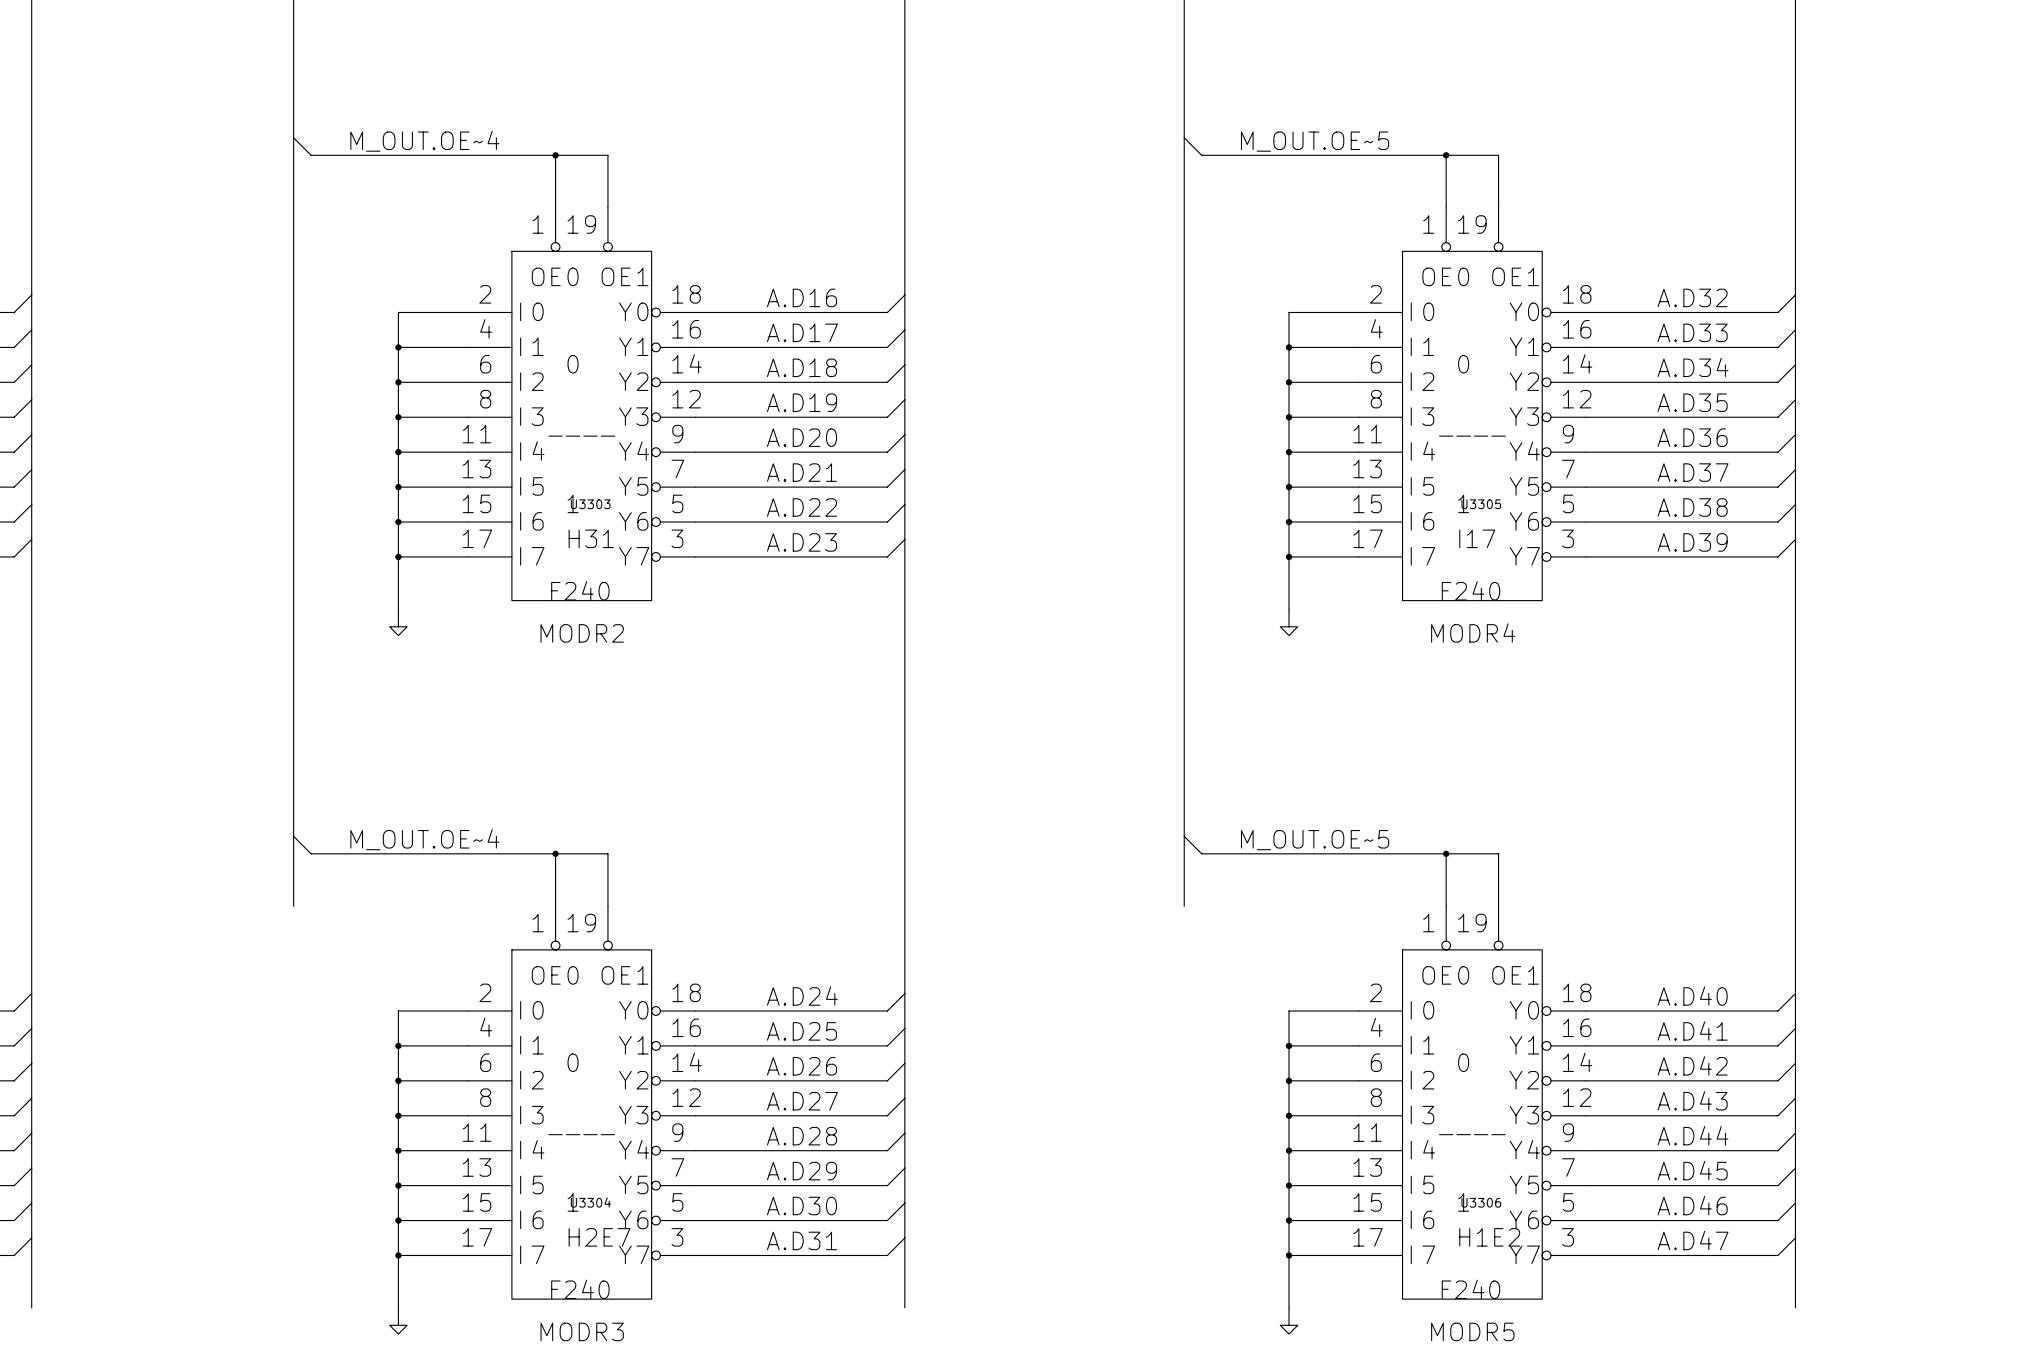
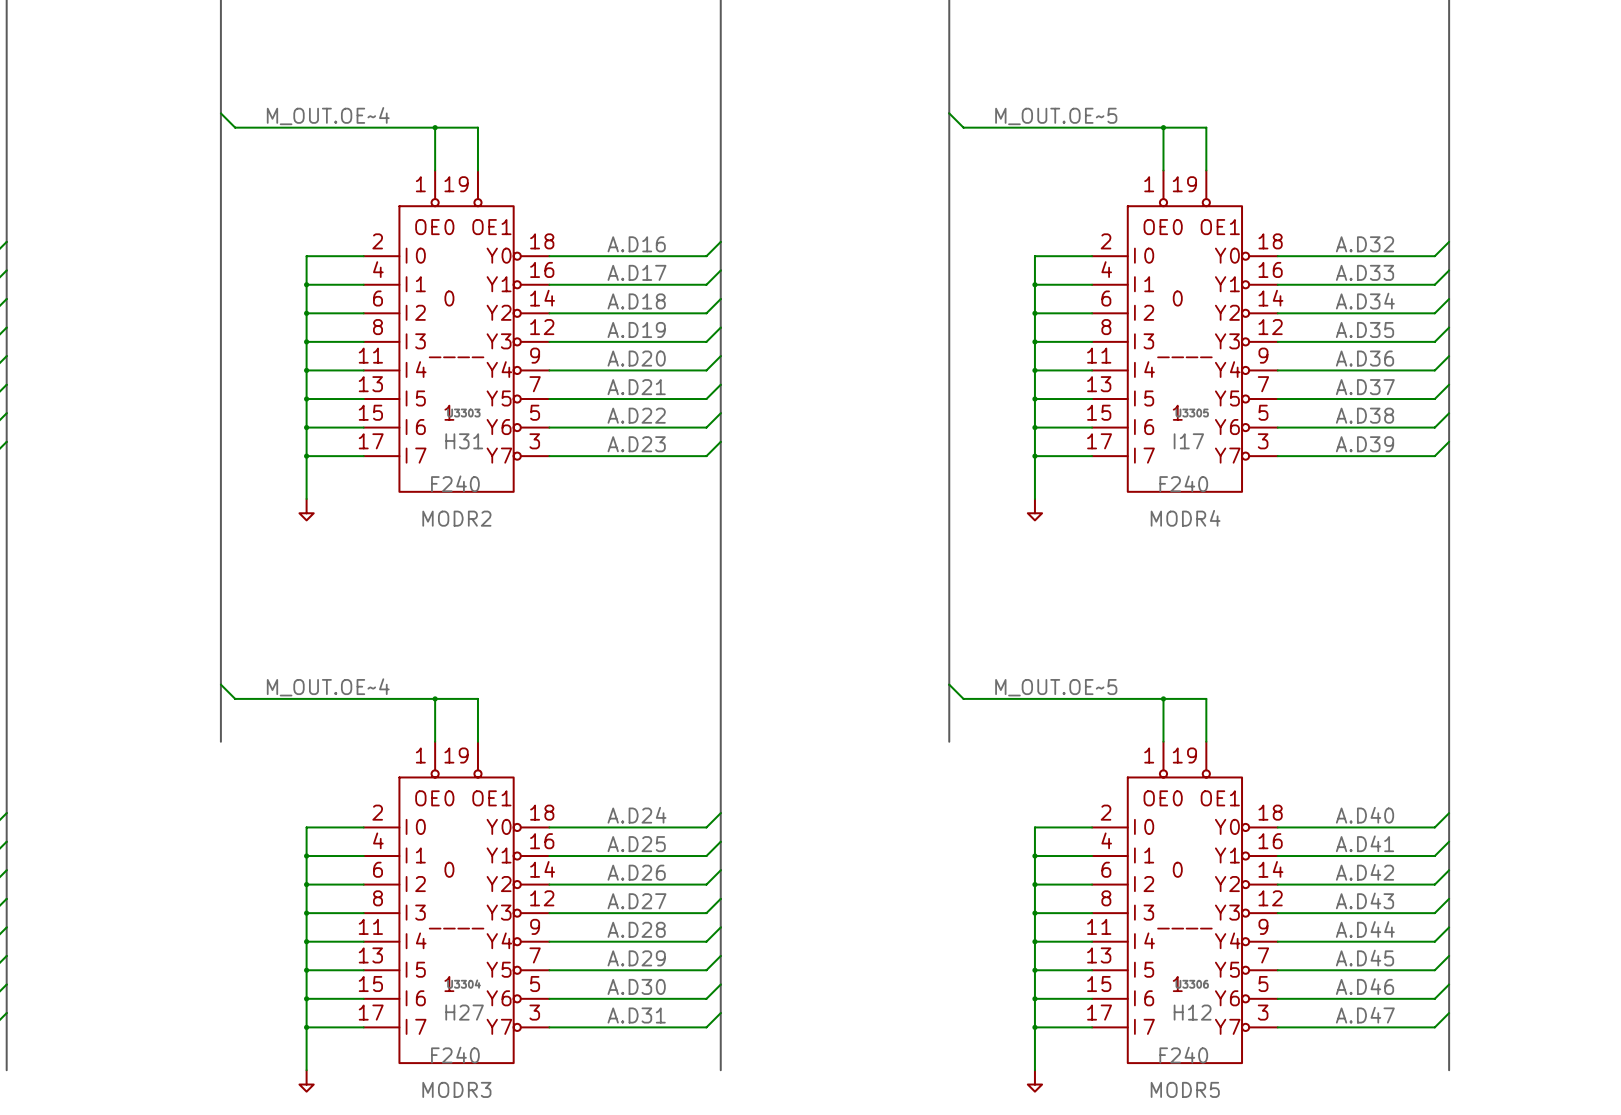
U3304 text: H2E7 (599, 1237) -> H27 (464, 1012)
U3306 text: H1E2 (1489, 1237) -> H12 (1192, 1012)

